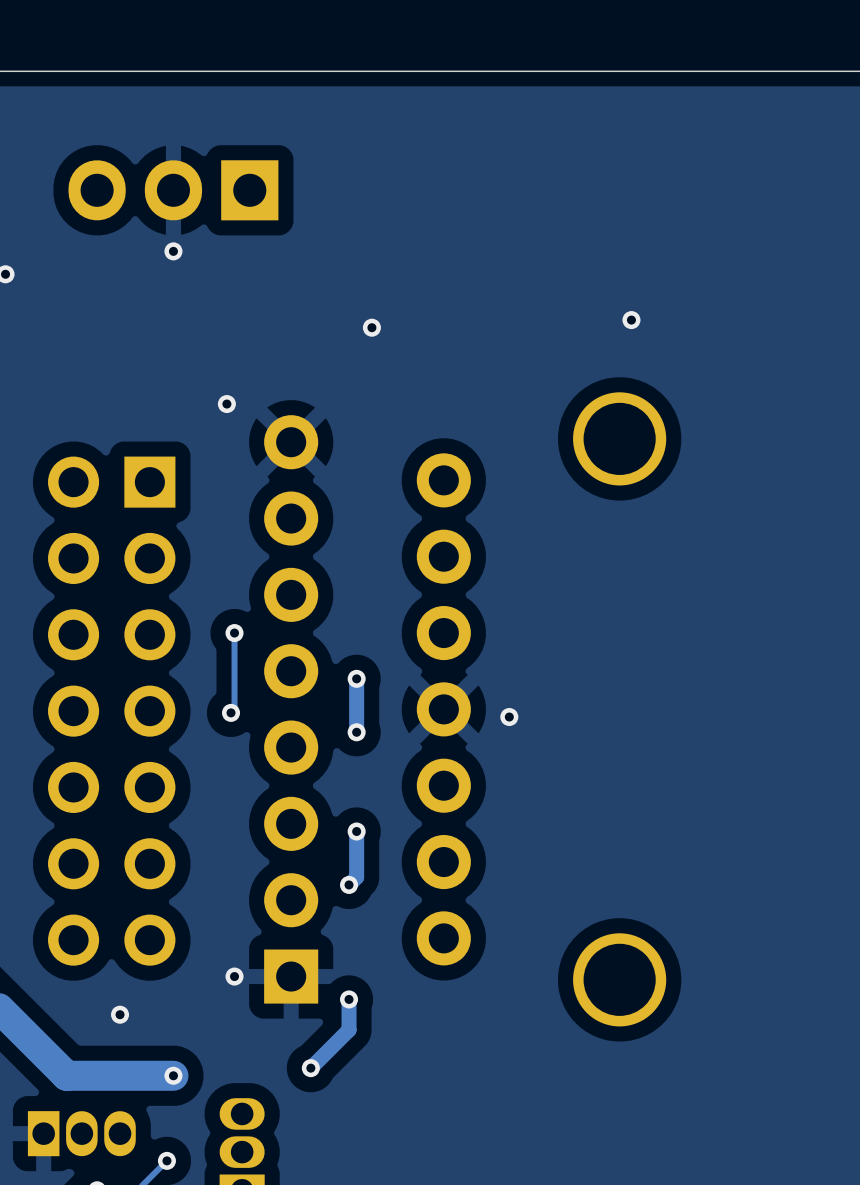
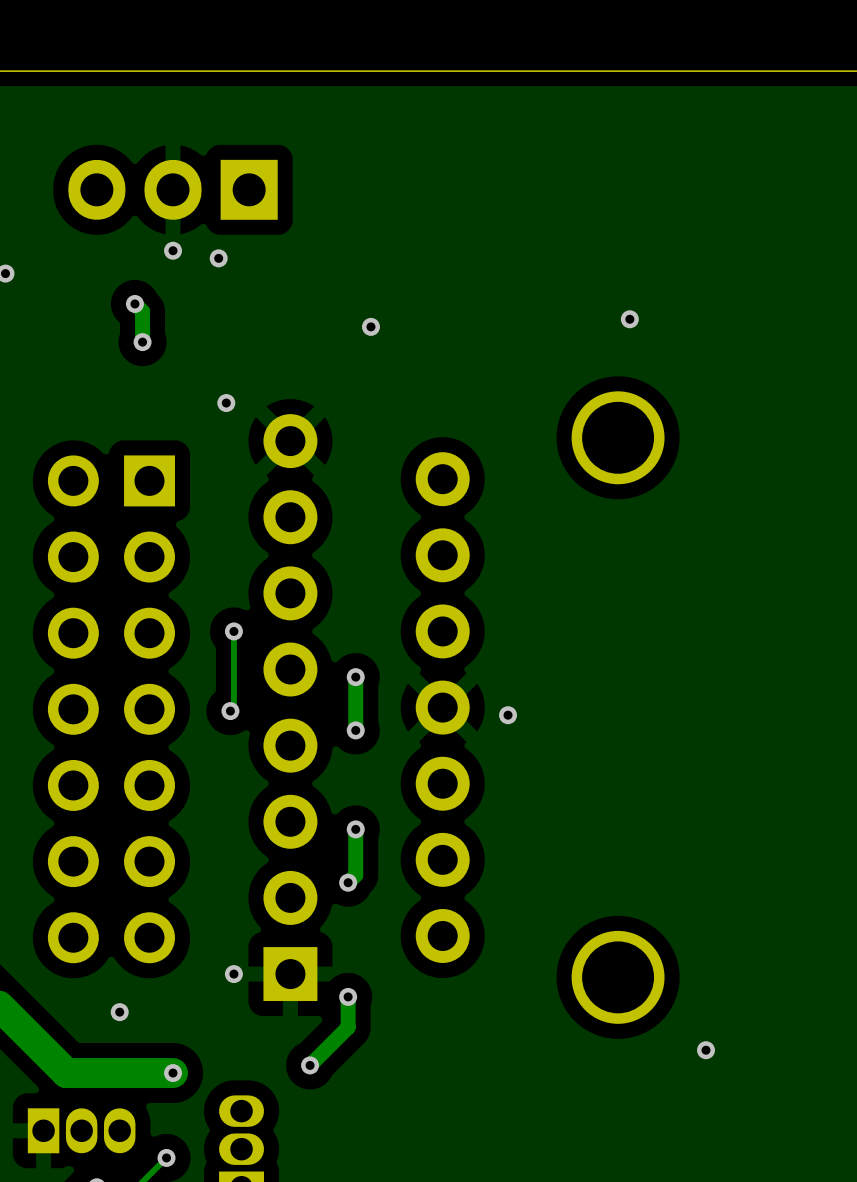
via: none -> (218, 258)
track: none -> (134, 303) (142, 311) (142, 342)
via: none -> (134, 303)
via: none -> (142, 342)
via: none -> (705, 1050)

